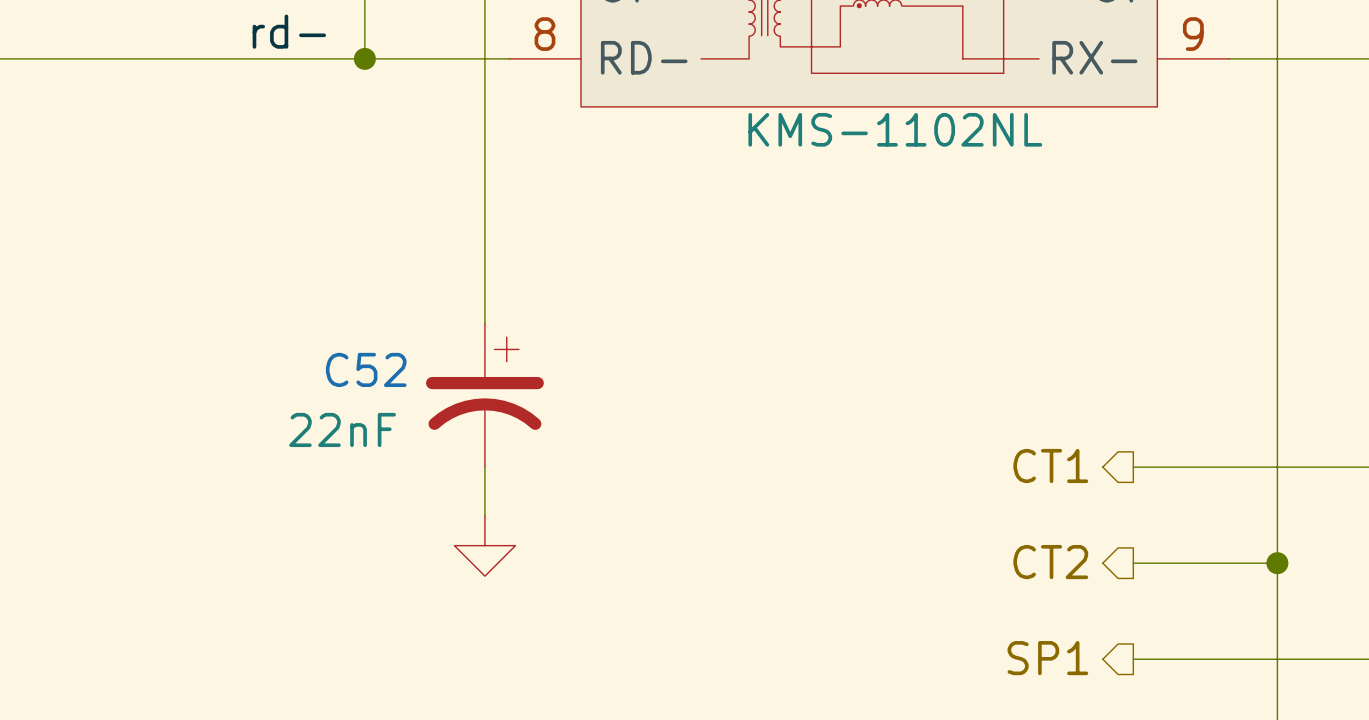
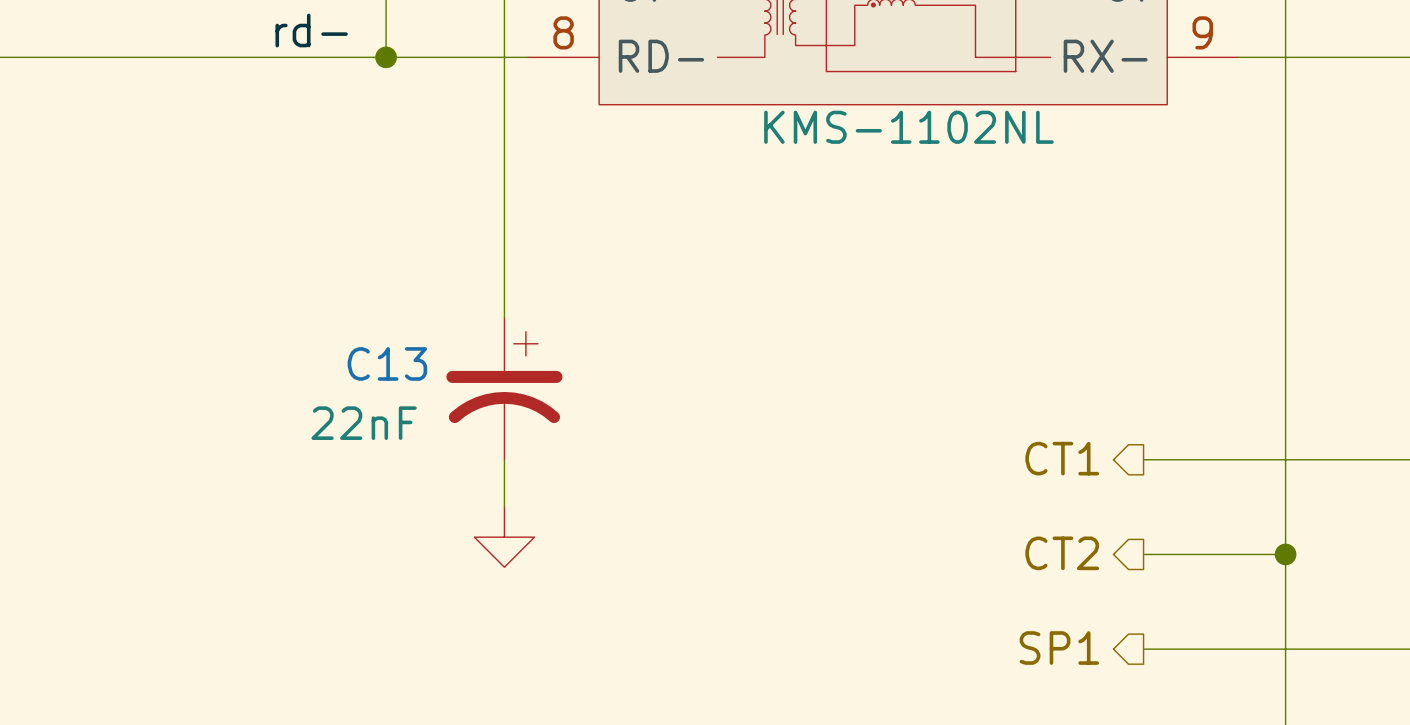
C52 name: C52 (366, 369) -> C13 (387, 363)

